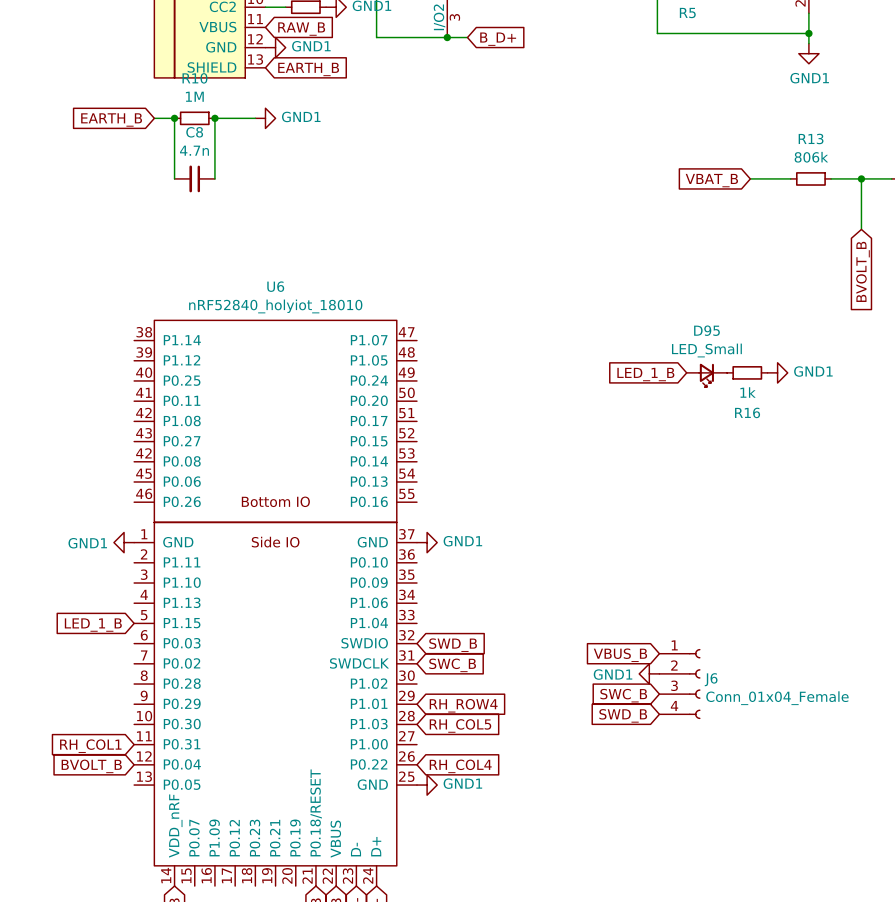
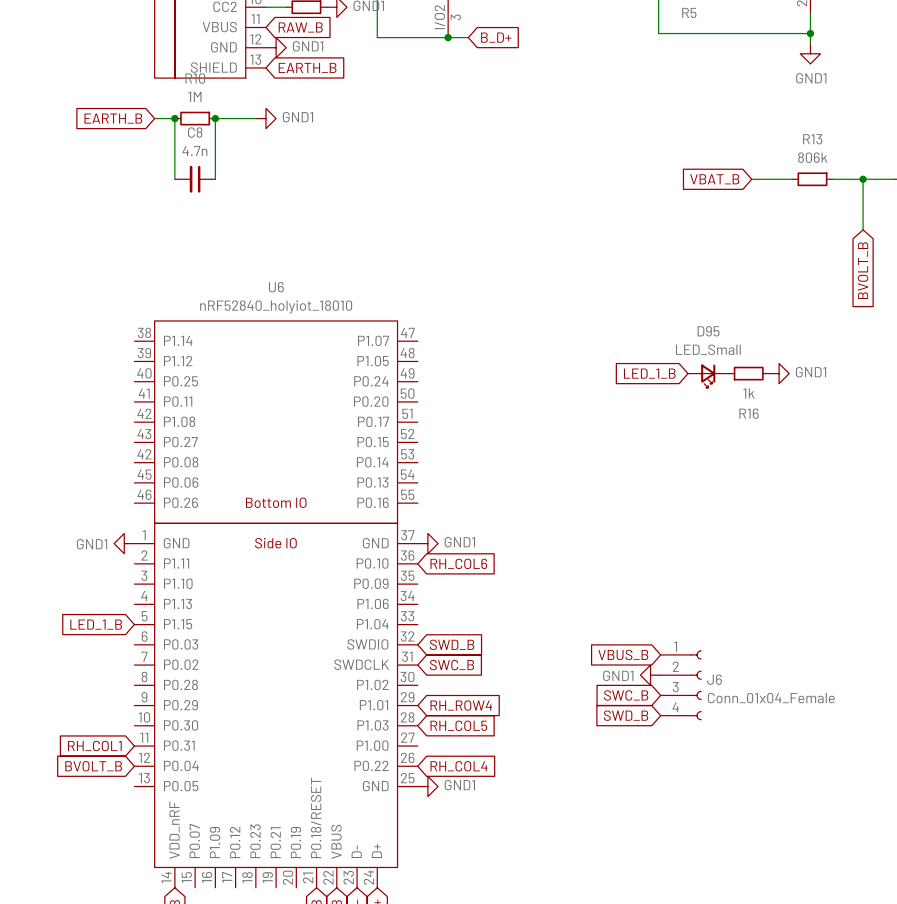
global label: none -> RH_COL6 (458, 563)

